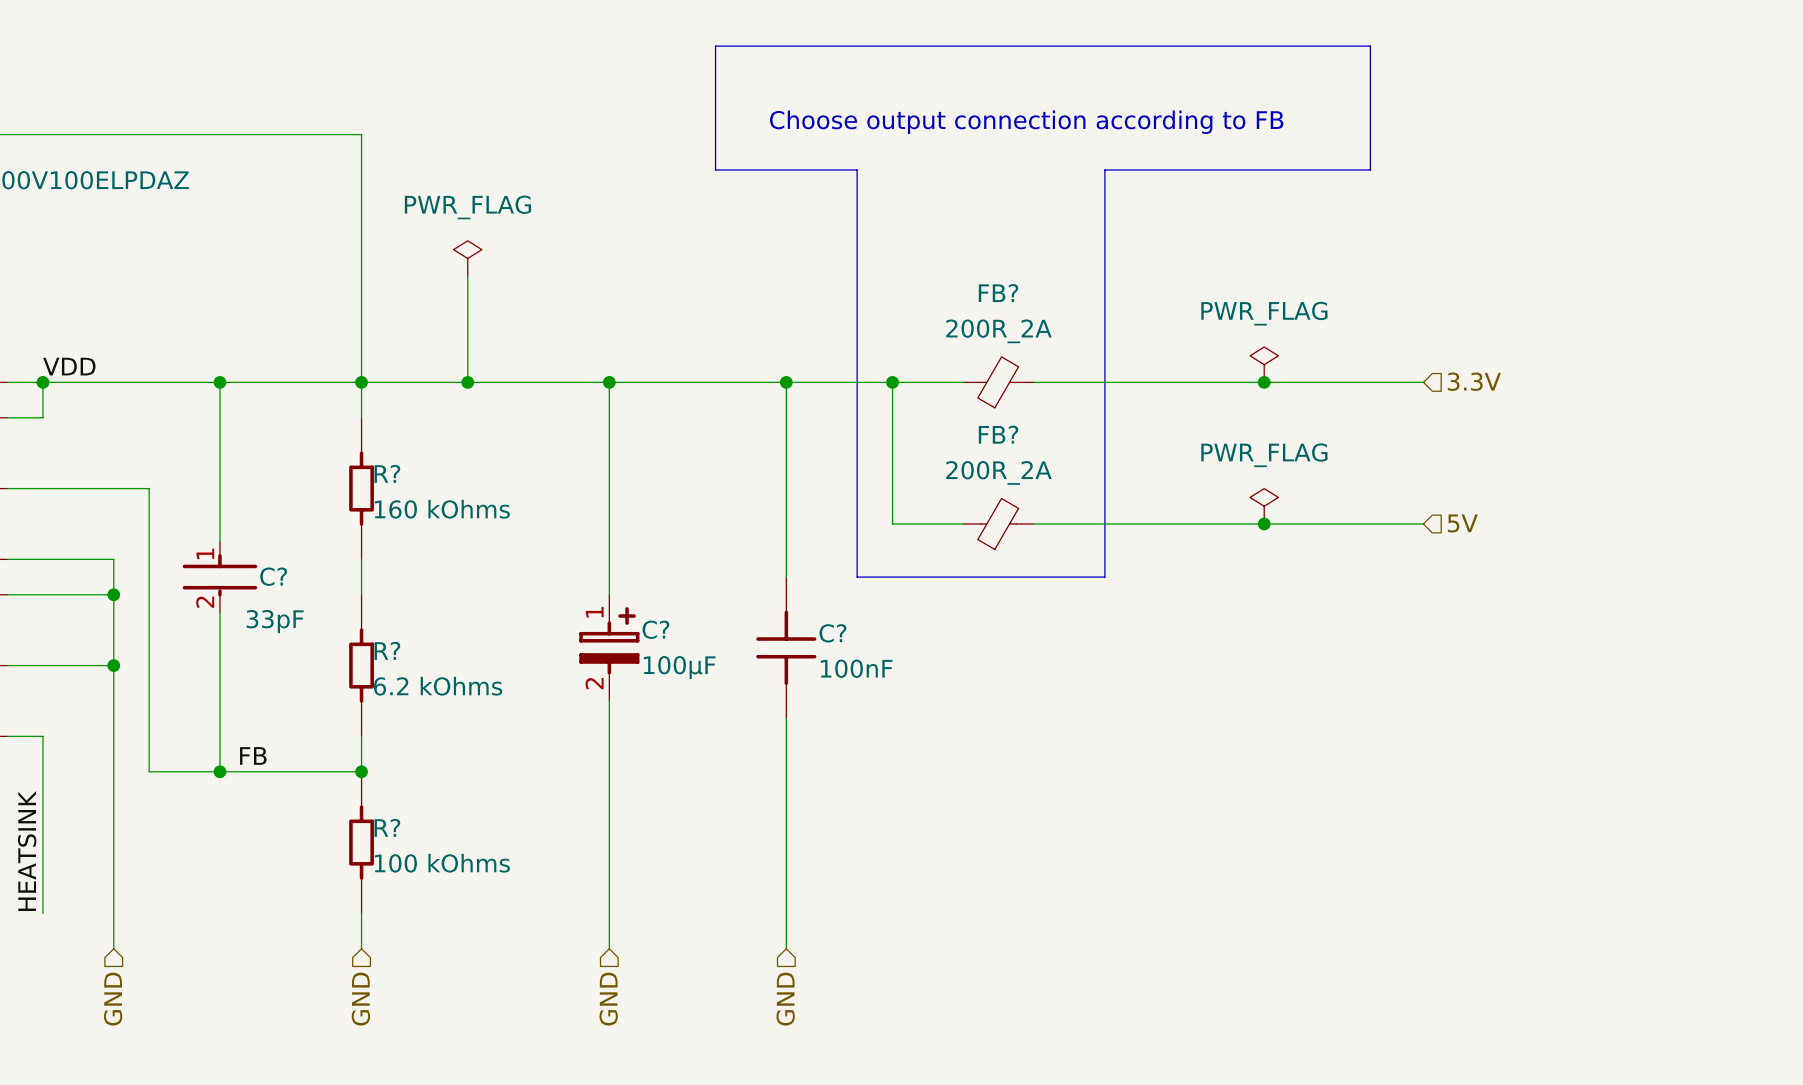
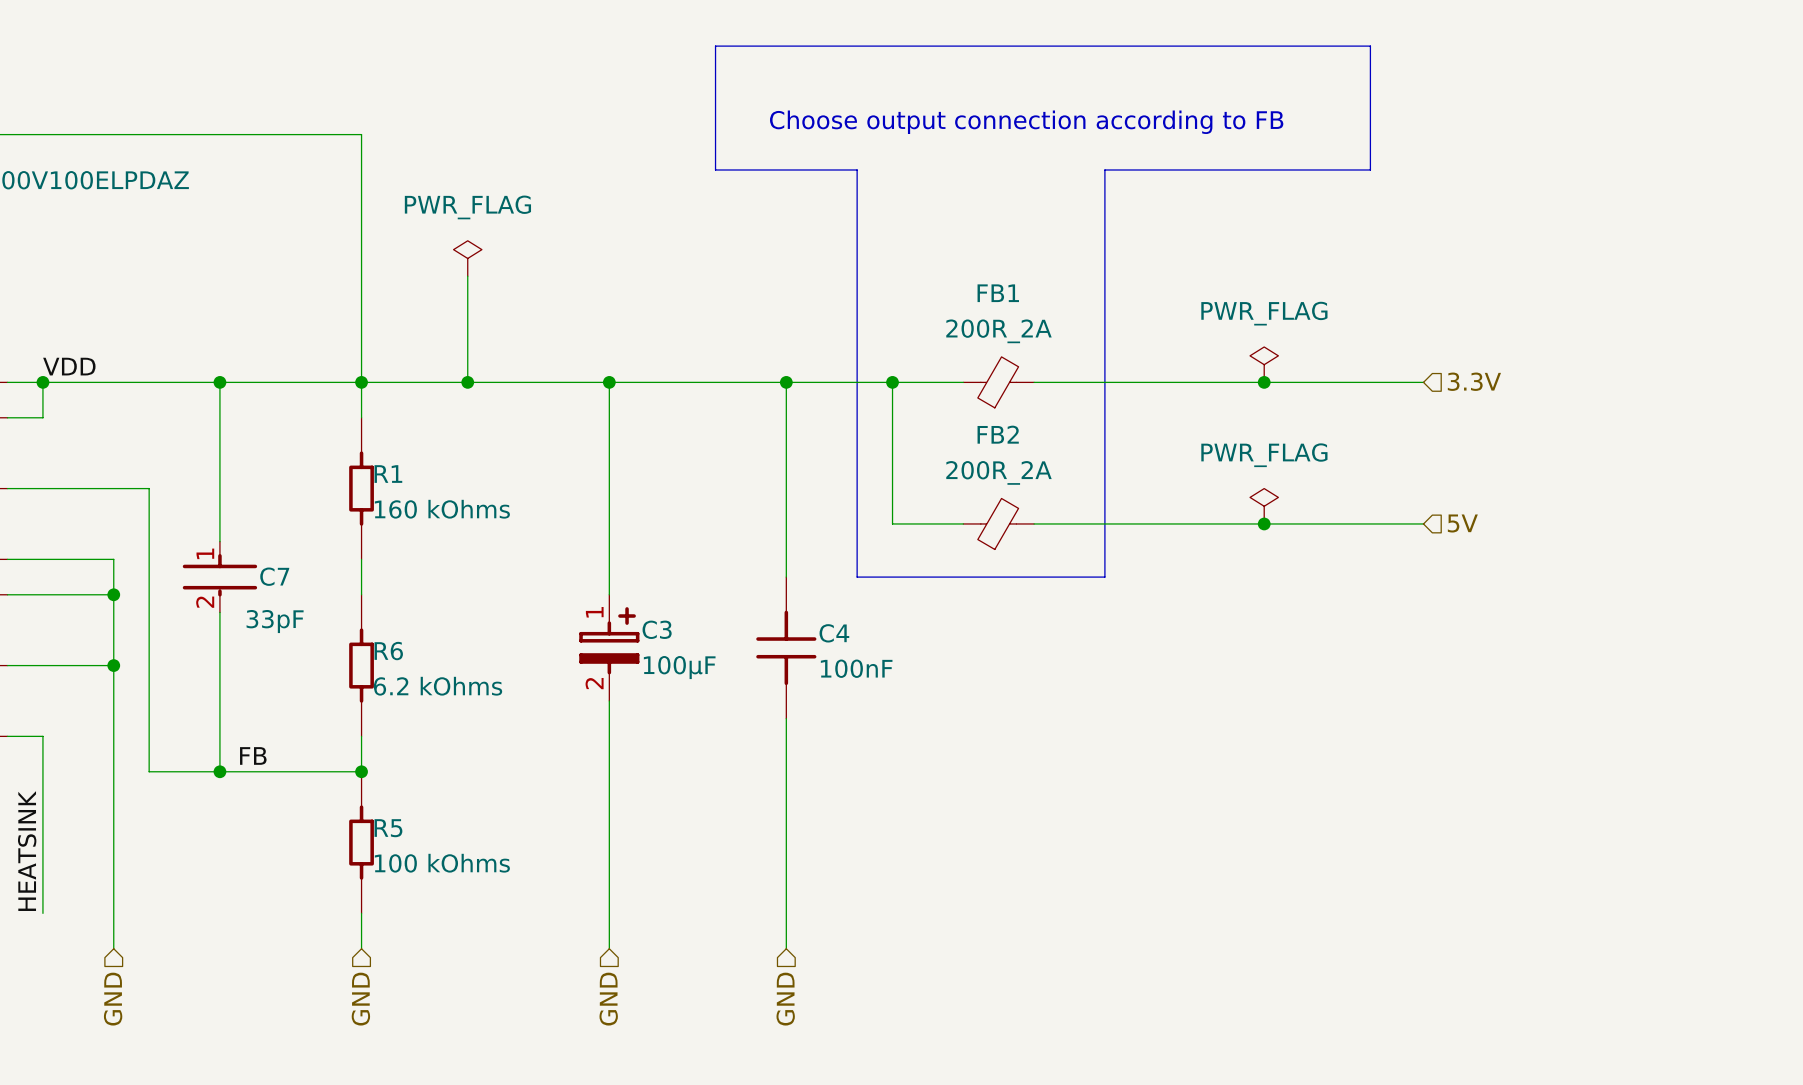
FB? name: FB? (998, 293) -> FB1 (998, 293)
FB? name: FB? (998, 434) -> FB2 (998, 434)
R? name: R? (387, 473) -> R1 (388, 474)
C? name: C? (273, 576) -> C7 (274, 576)
C? name: C? (655, 629) -> C3 (657, 629)
C? name: C? (832, 633) -> C4 (834, 633)
R? name: R? (387, 650) -> R6 (388, 651)
R? name: R? (387, 827) -> R5 (388, 828)

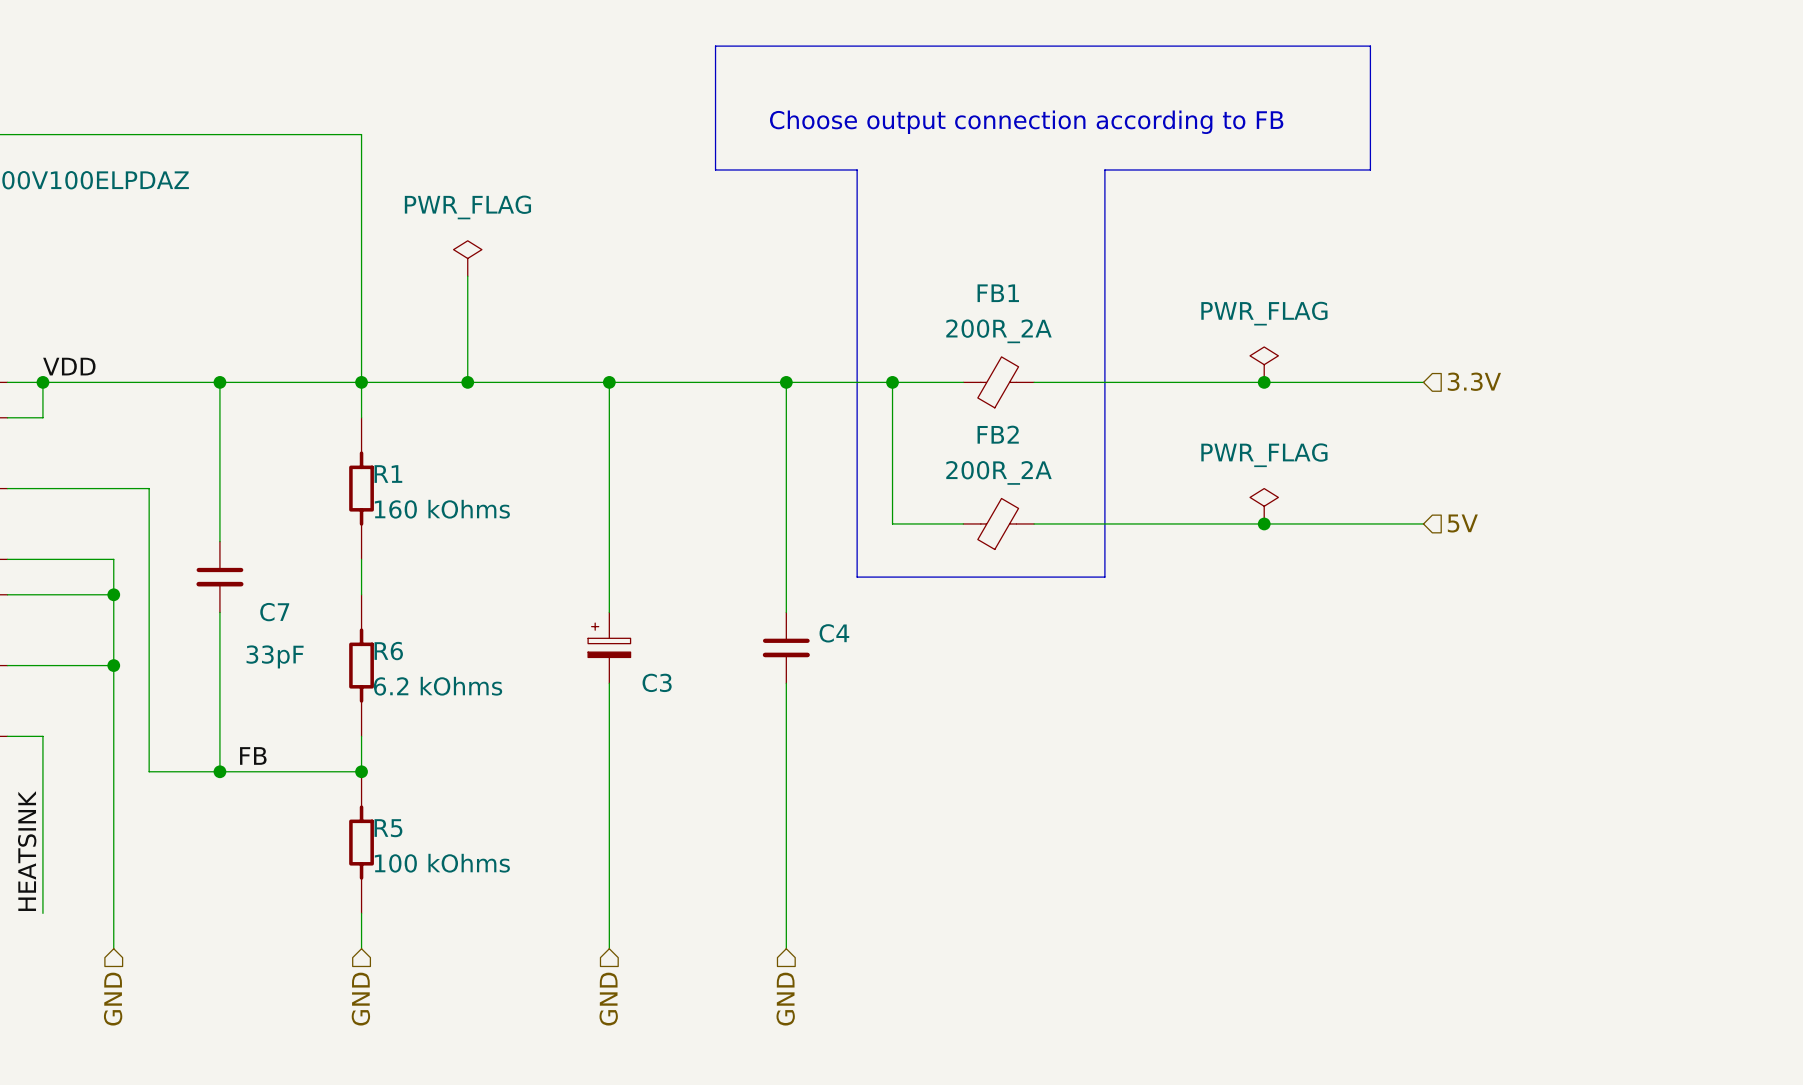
C7 symbol: [182, 541, 258, 613] -> [196, 541, 244, 613]
C7 name position: C7 (274, 576) -> C7 (274, 612)
C4 symbol: [756, 577, 817, 719] -> [762, 612, 810, 684]
C3 symbol: [579, 594, 640, 701] -> [588, 612, 631, 684]
C7 text position: 33pF (275, 621) -> 33pF (275, 656)
C3 name position: C3 (657, 629) -> C3 (657, 682)
C3 text: 100µF (679, 667) -> none
C4 text: 100nF (856, 668) -> none

